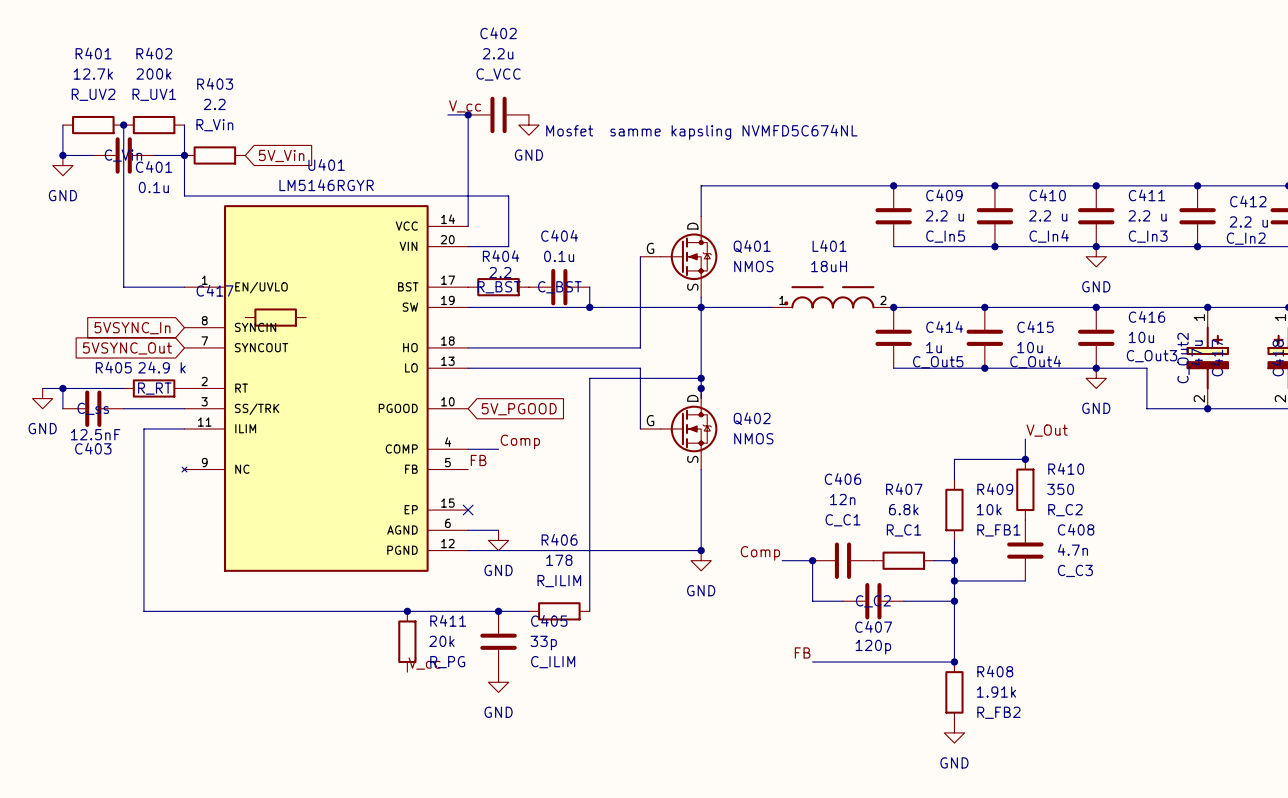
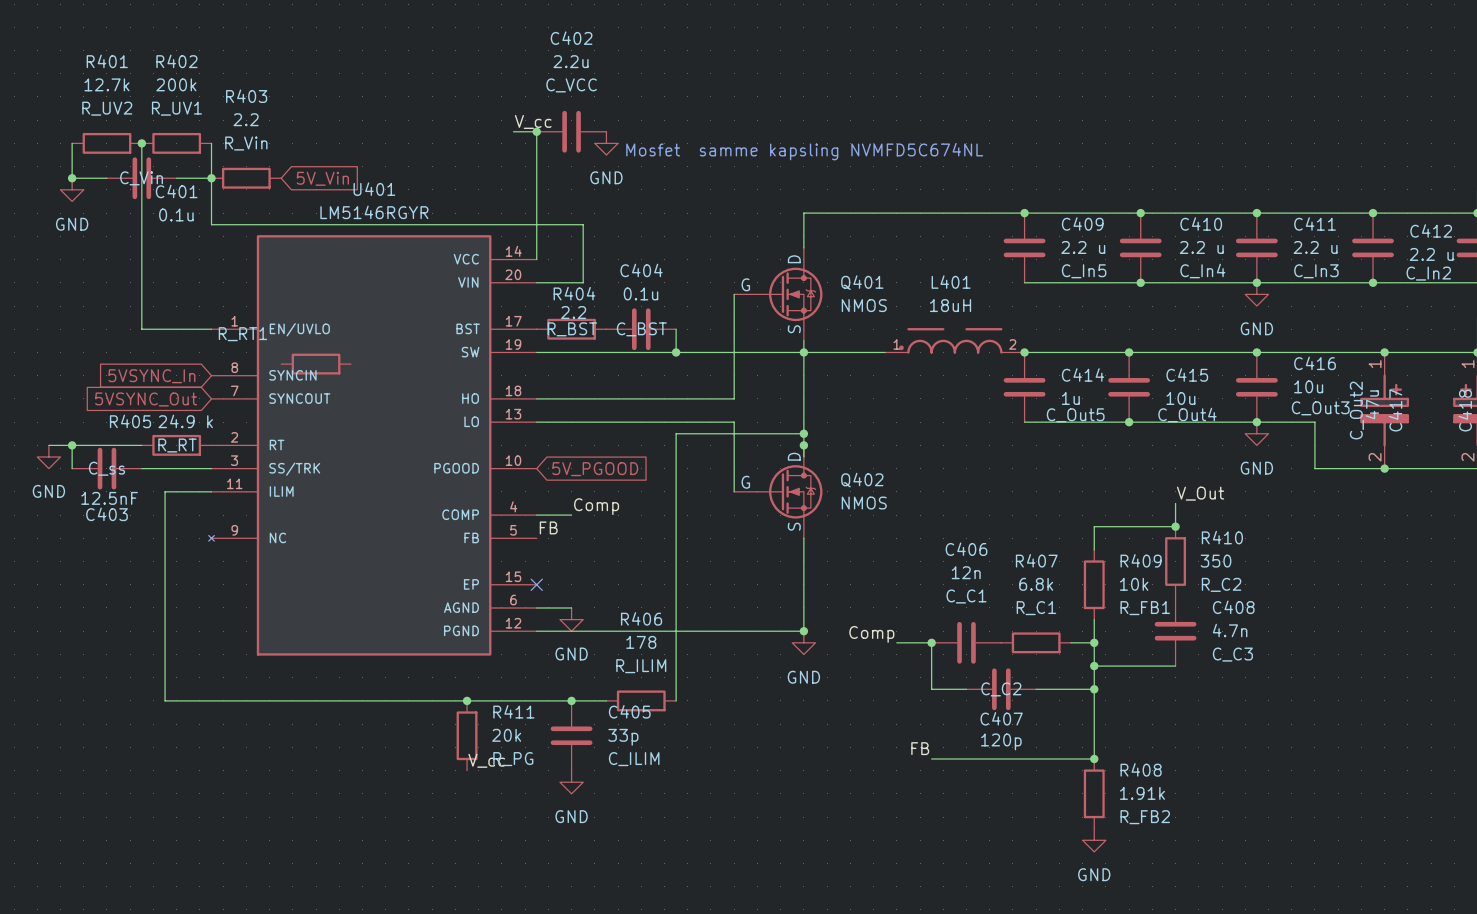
C417 name: C417 (215, 290) -> R_RT1 (242, 334)

